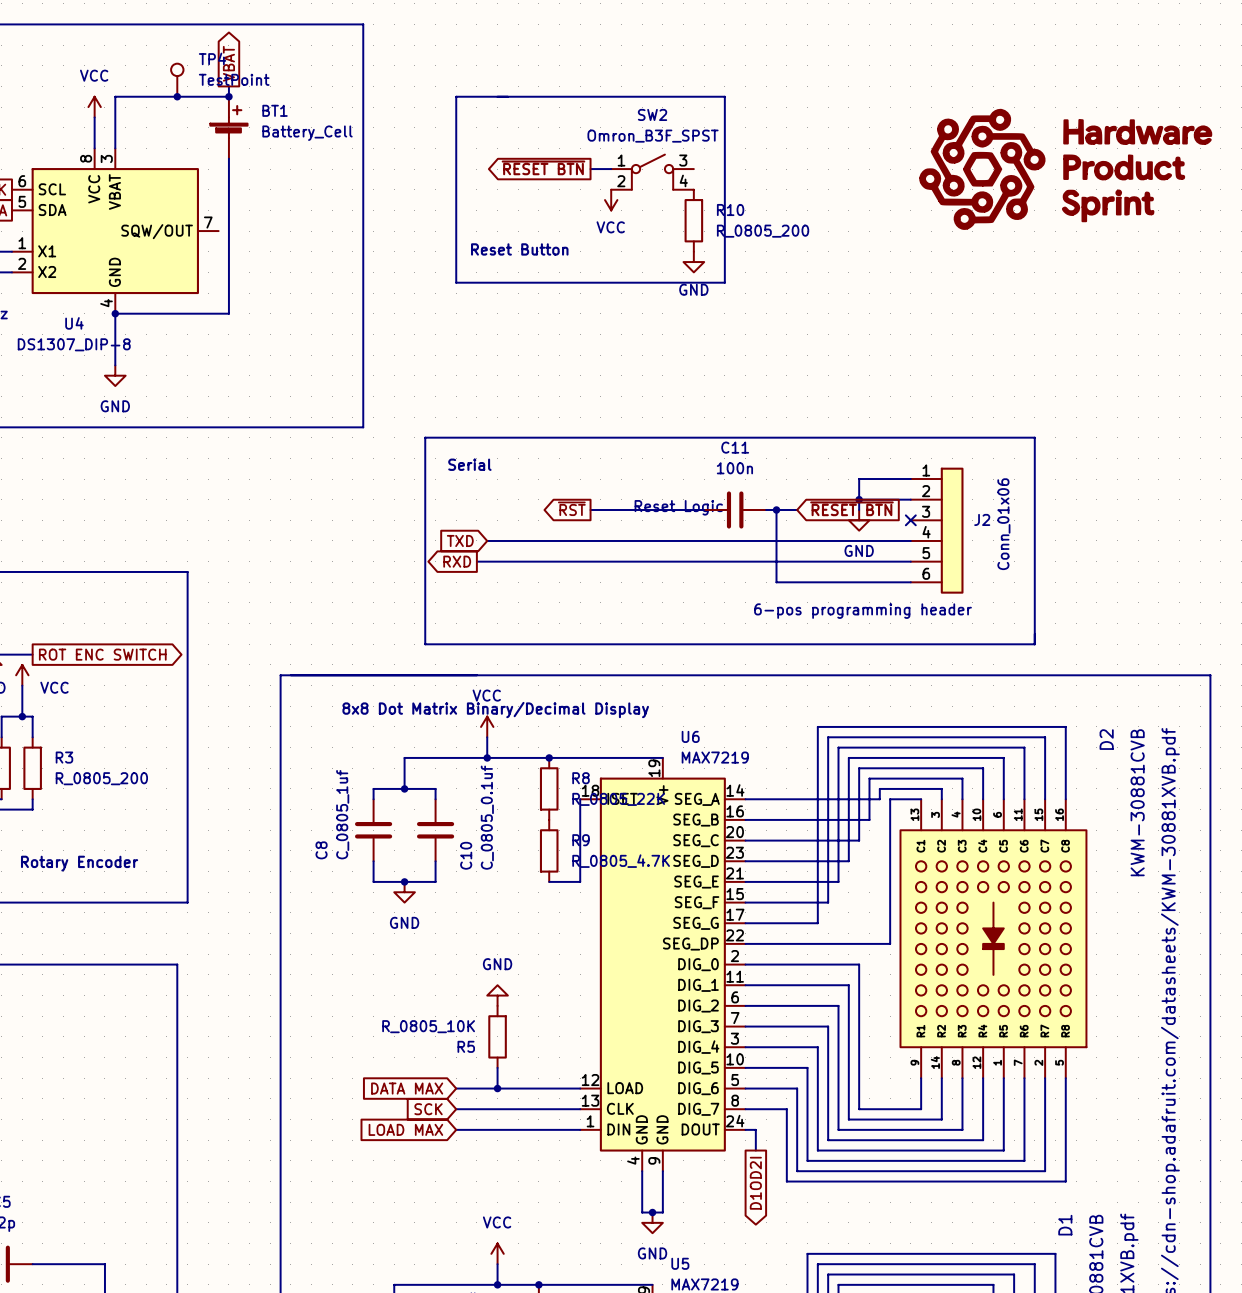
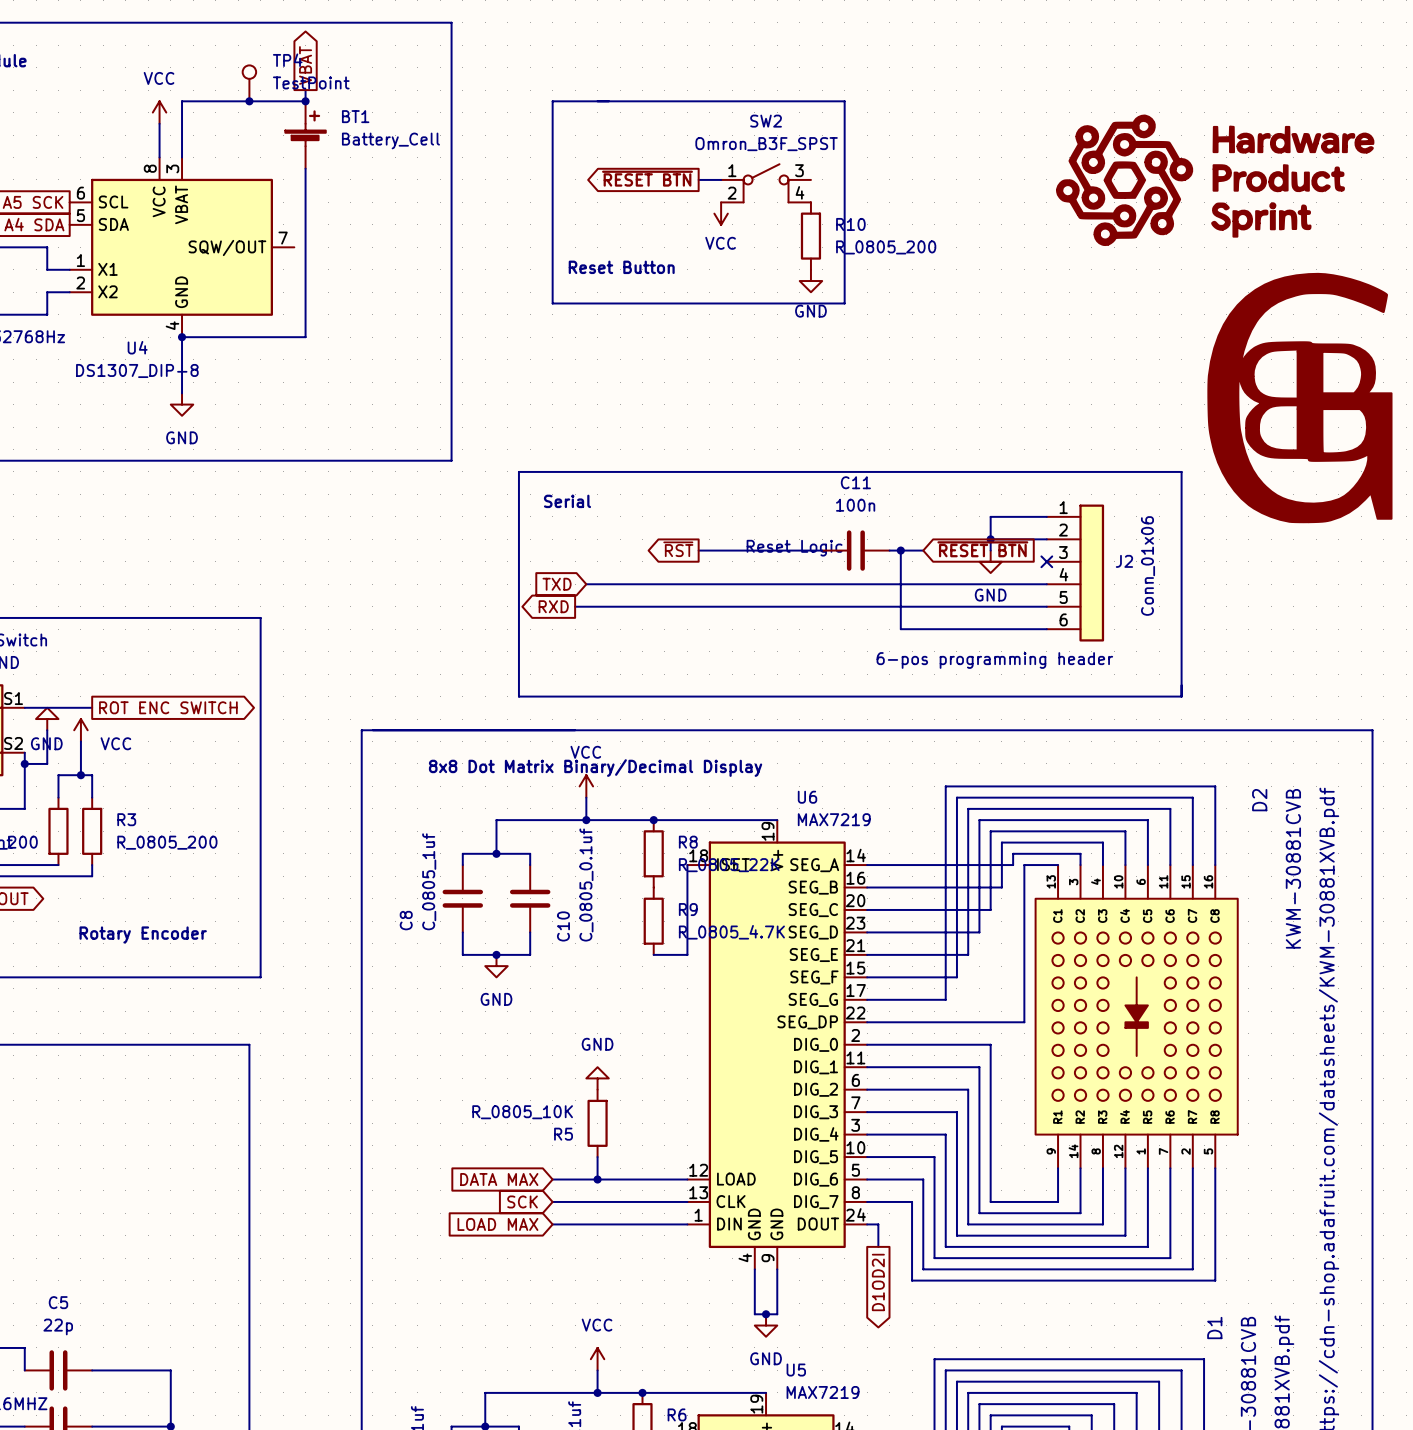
drawing: none -> [1208, 273, 1392, 523]

